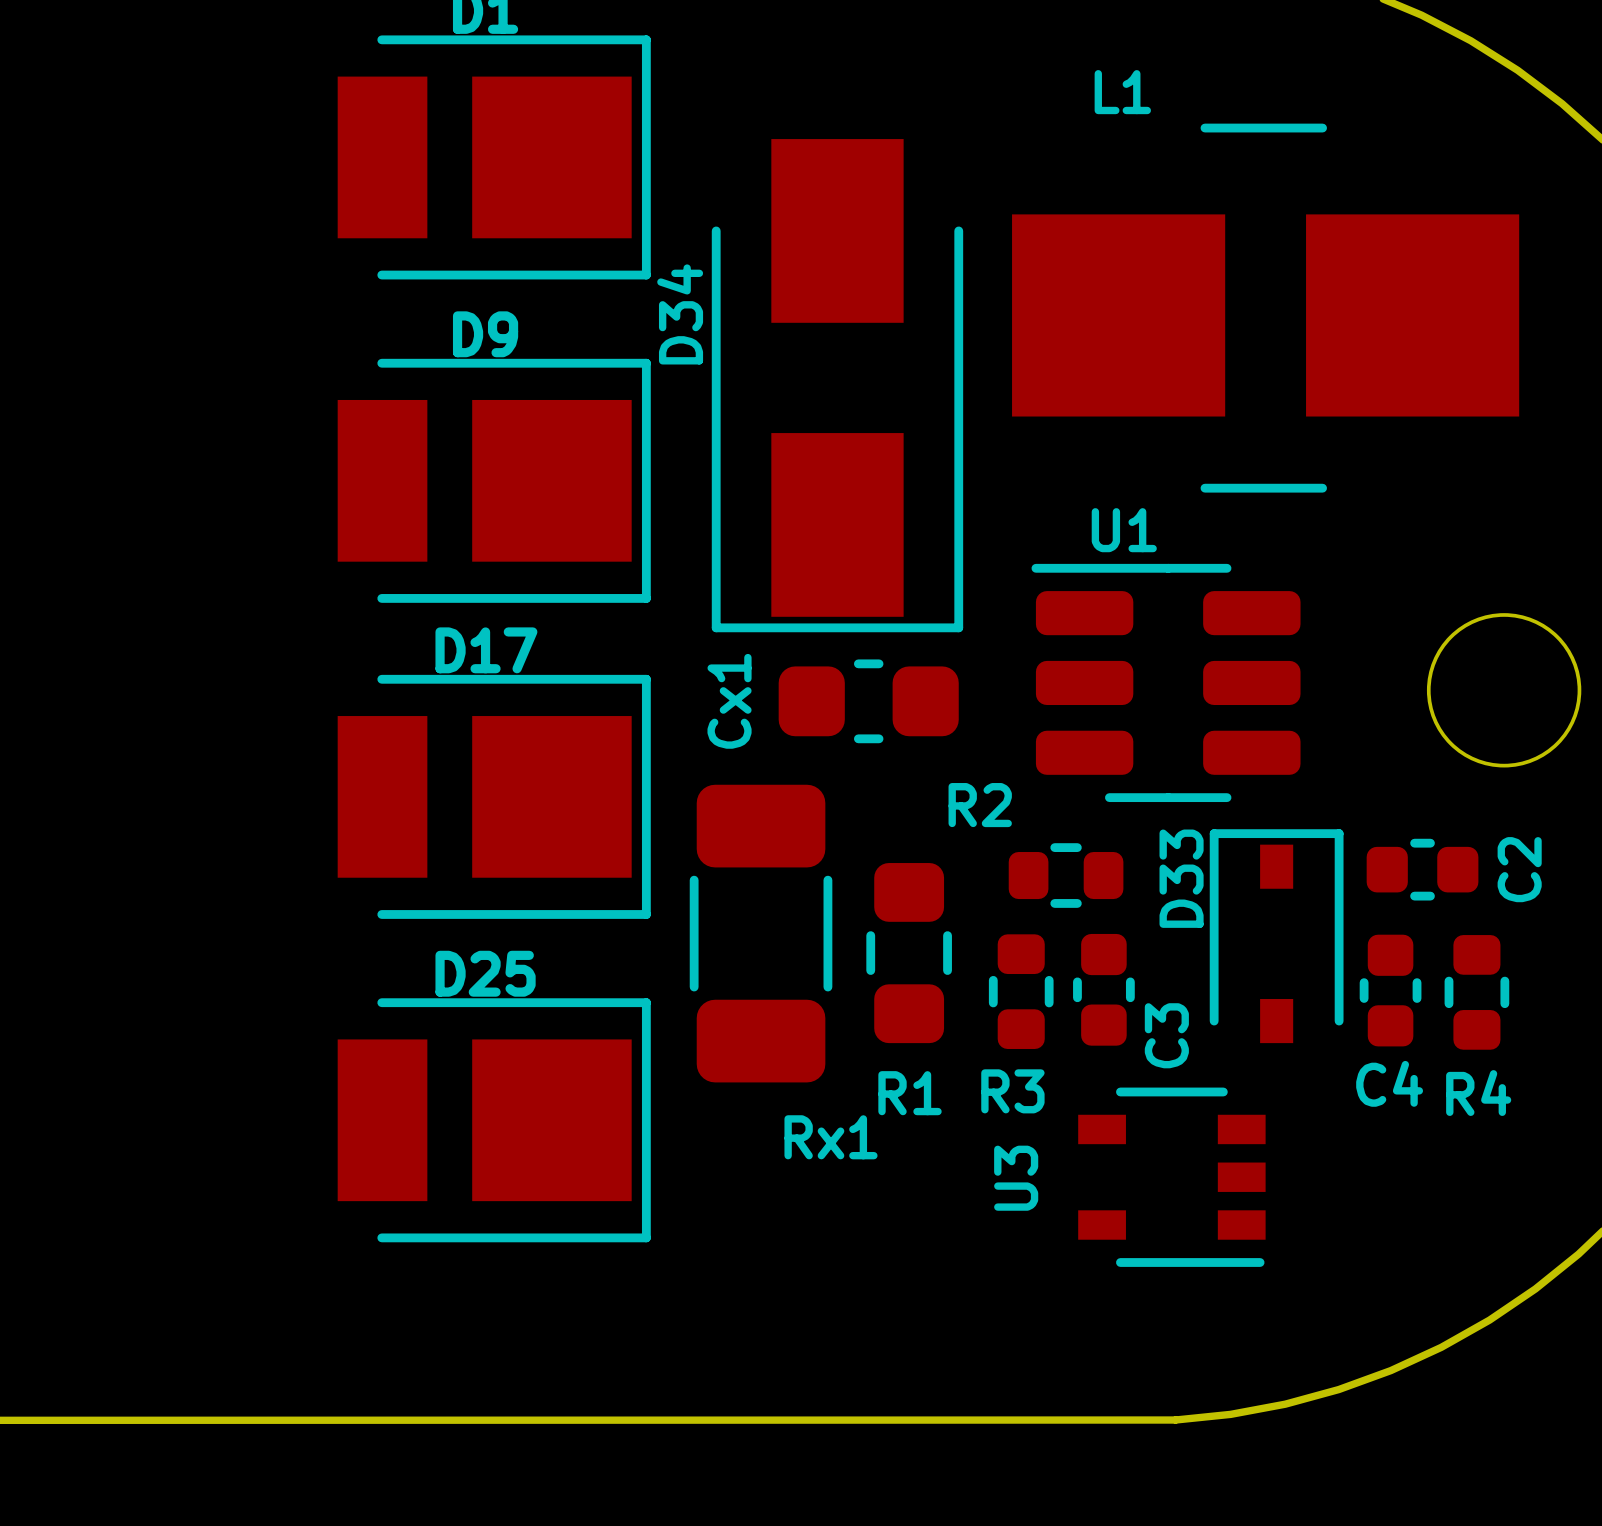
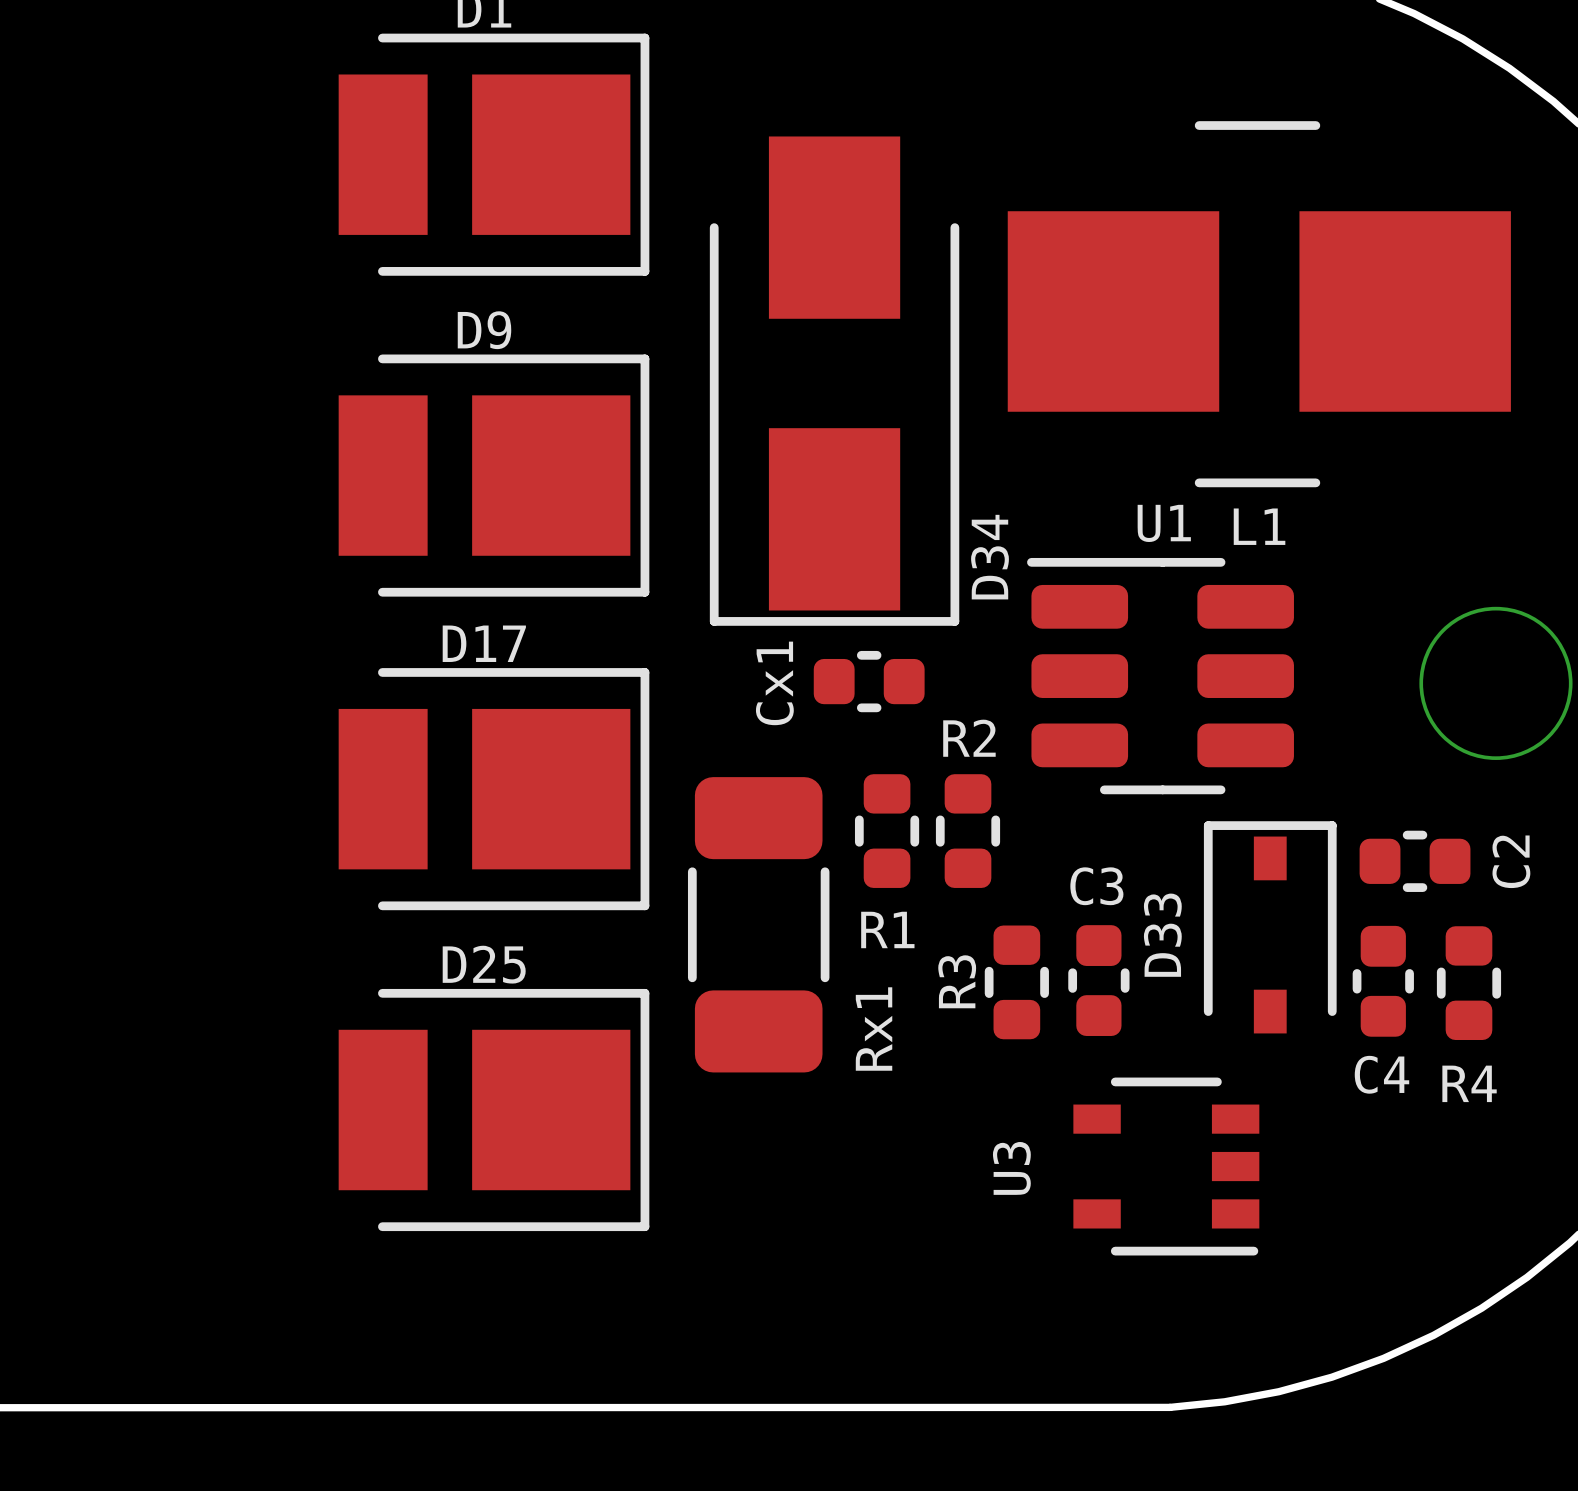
L1 name position: L1 (1122, 92) -> L1 (1259, 526)
D34 name position: D34 (680, 314) -> D34 (990, 557)
U1 name position: U1 (1124, 530) -> U1 (1164, 523)
Cx1 footprint: [778, 659, 959, 744] -> [813, 650, 925, 713]
Cx1 name position: Cx1 (729, 701) -> Cx1 (774, 683)
R1 footprint: [866, 863, 952, 1044] -> [854, 774, 920, 888]
R2 rotation: 0° (1066, 875) -> 90° clockwise (968, 831)
R2 position: (1066, 875) -> (968, 831)
D33 name position: D33 (1181, 878) -> D33 (1162, 935)
C3 name rotation: 0° (1166, 1035) -> 90° clockwise (1096, 886)
C3 name position: C3 (1166, 1035) -> C3 (1096, 886)
R3 name rotation: 0° (1012, 1091) -> 90° counterclockwise (957, 981)
R3 name position: R3 (1012, 1091) -> R3 (957, 981)
Rx1 name rotation: 0° (831, 1137) -> 90° counterclockwise (874, 1029)

